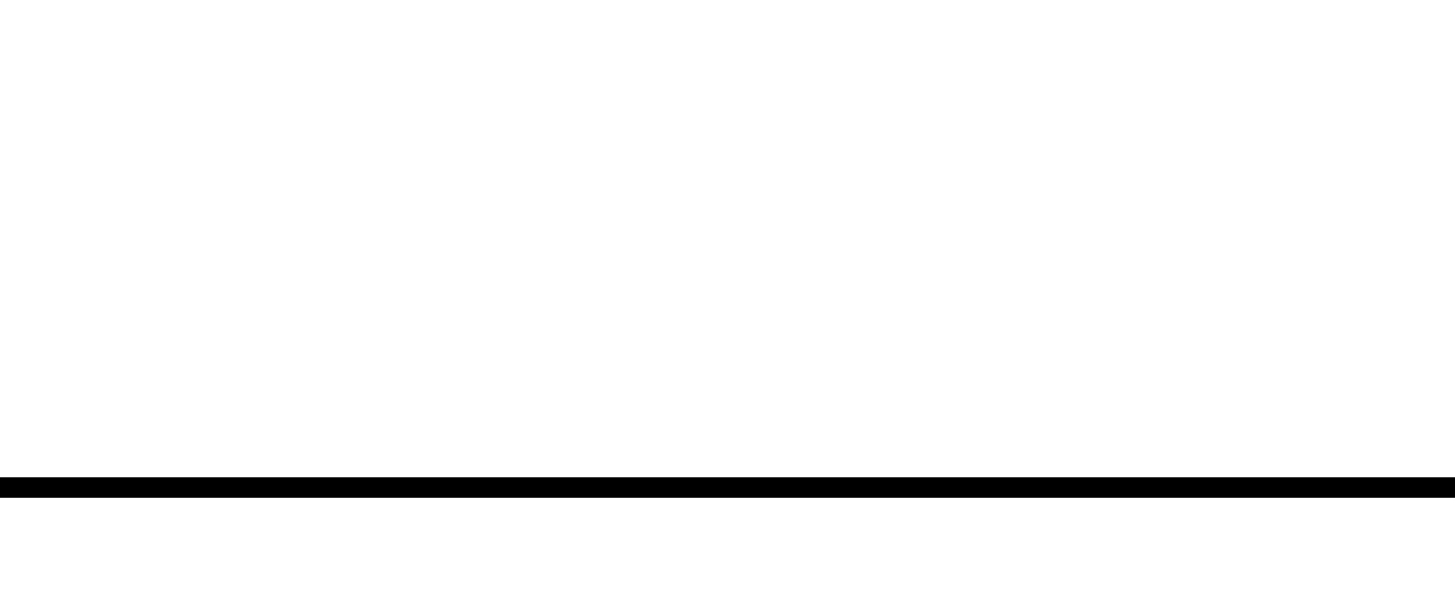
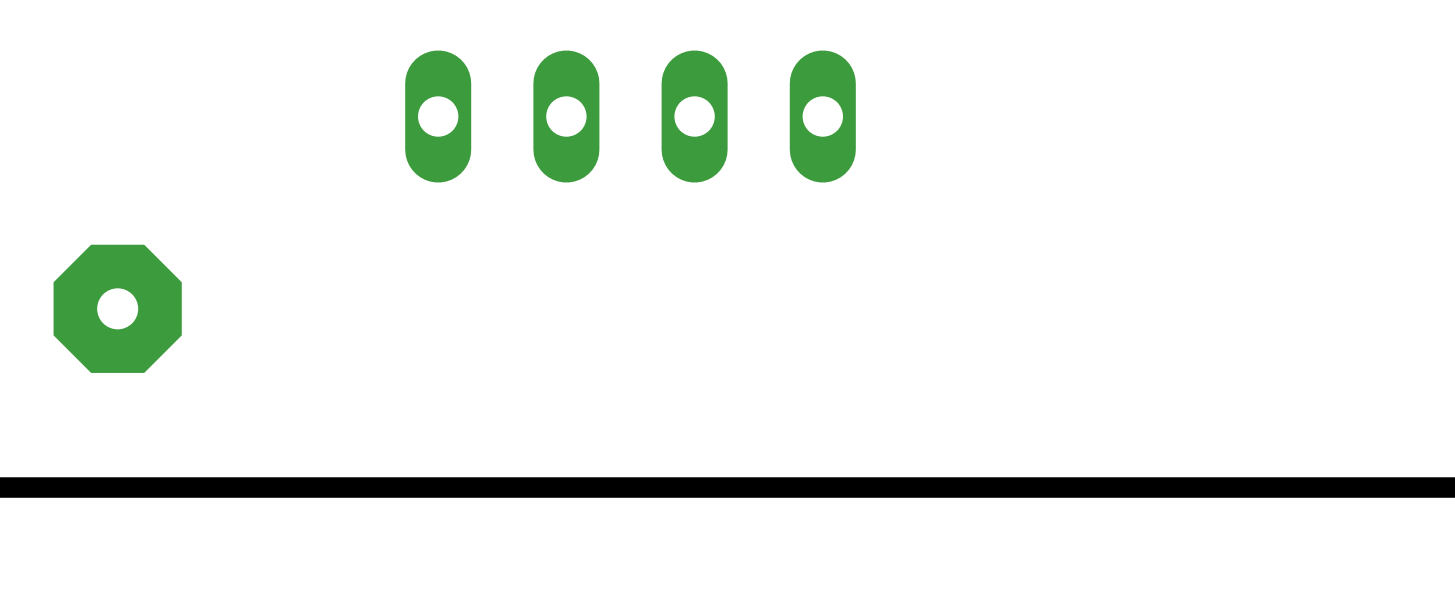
part: none -> (630, 116)
part: none -> (117, 308)

